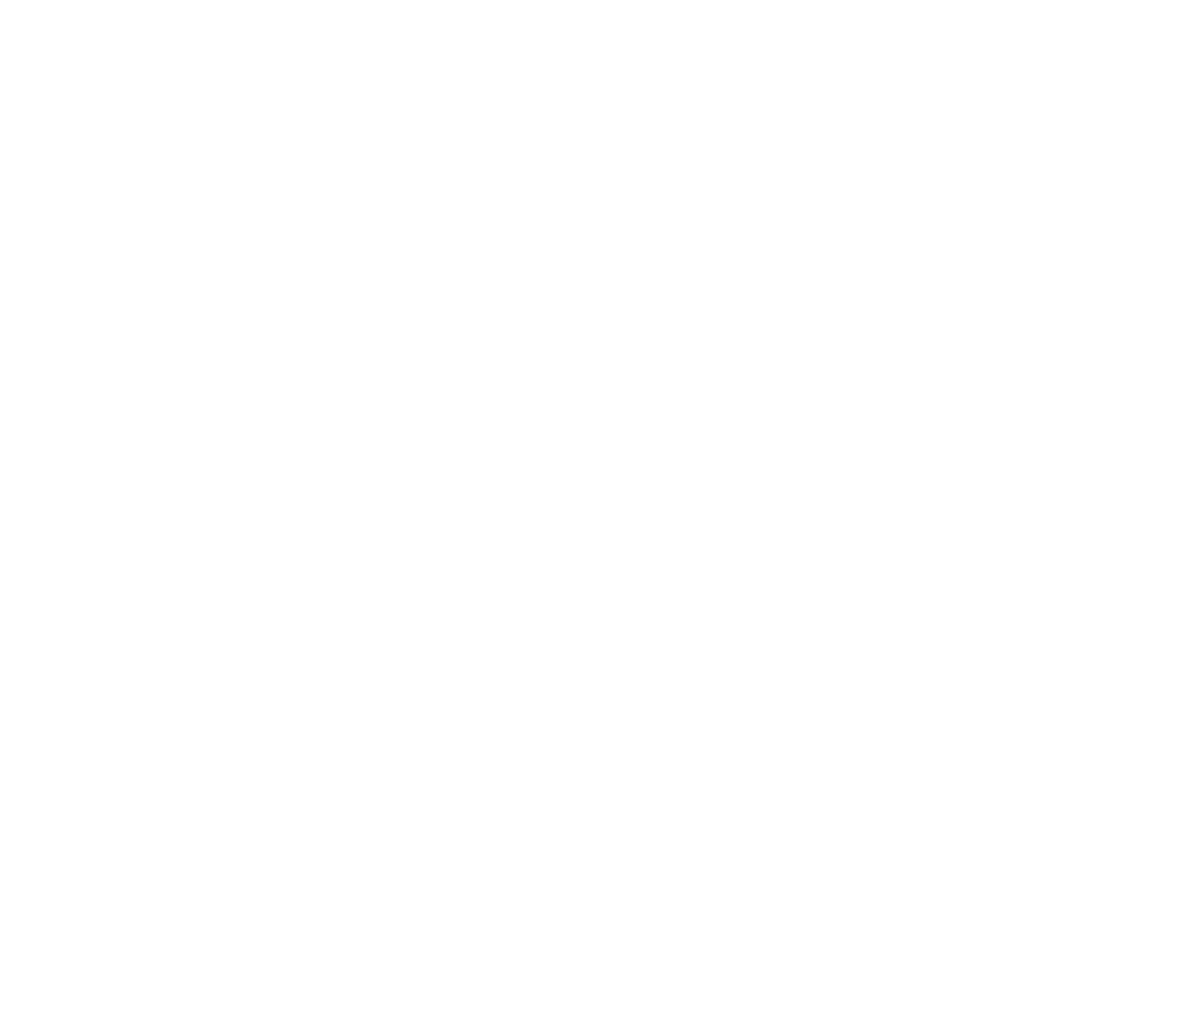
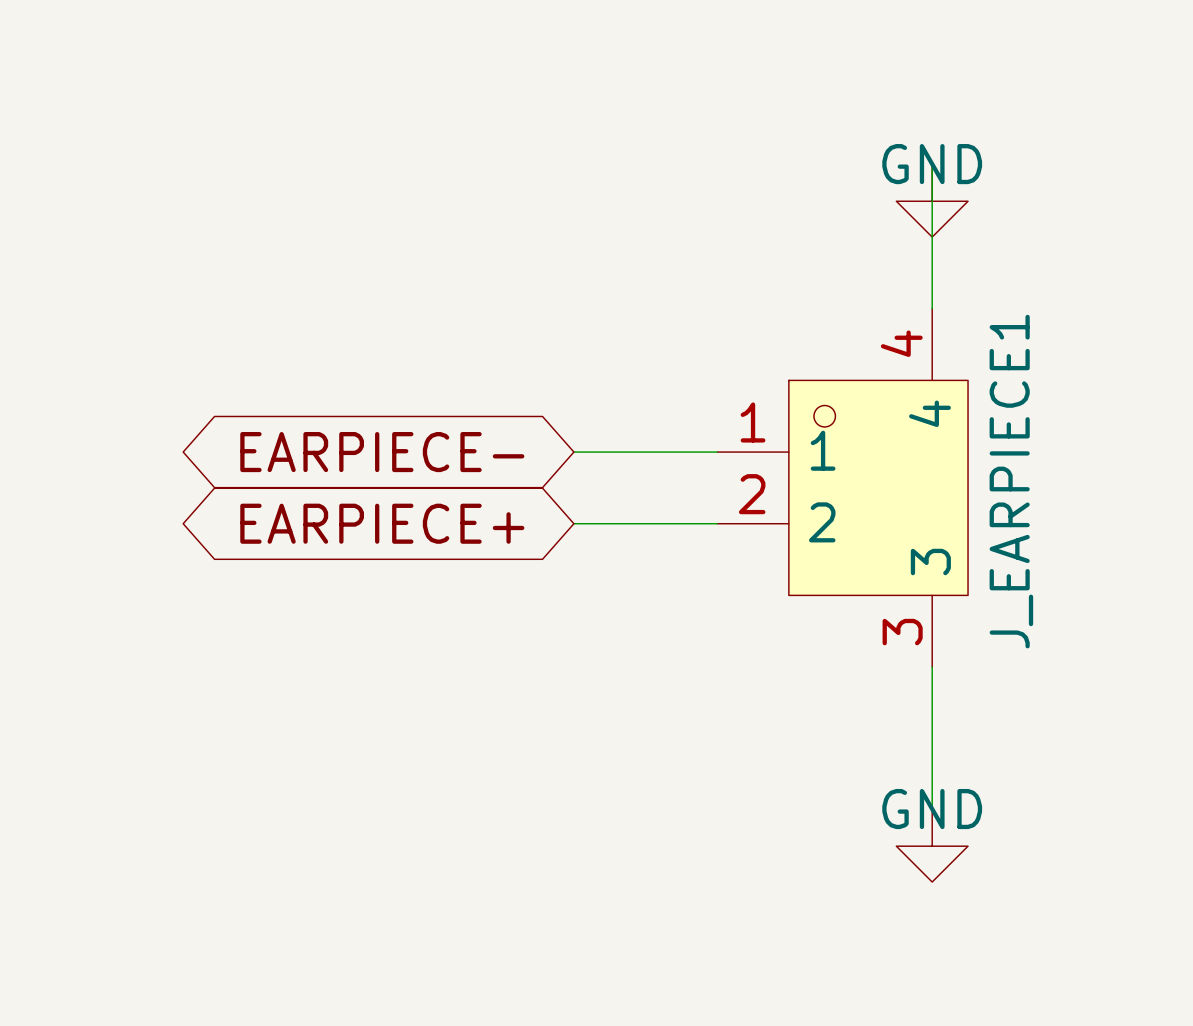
wire: none -> (932, 165) (932, 308)
power symbol: none -> GND (932, 201)
global label: none -> EARPIECE- (382, 452)
wire: none -> (573, 452) (717, 452)
J_EARPIECE1: none -> (842, 487)
global label: none -> EARPIECE+ (382, 523)
wire: none -> (573, 523) (717, 523)
wire: none -> (932, 667) (932, 810)
power symbol: none -> GND (932, 846)

